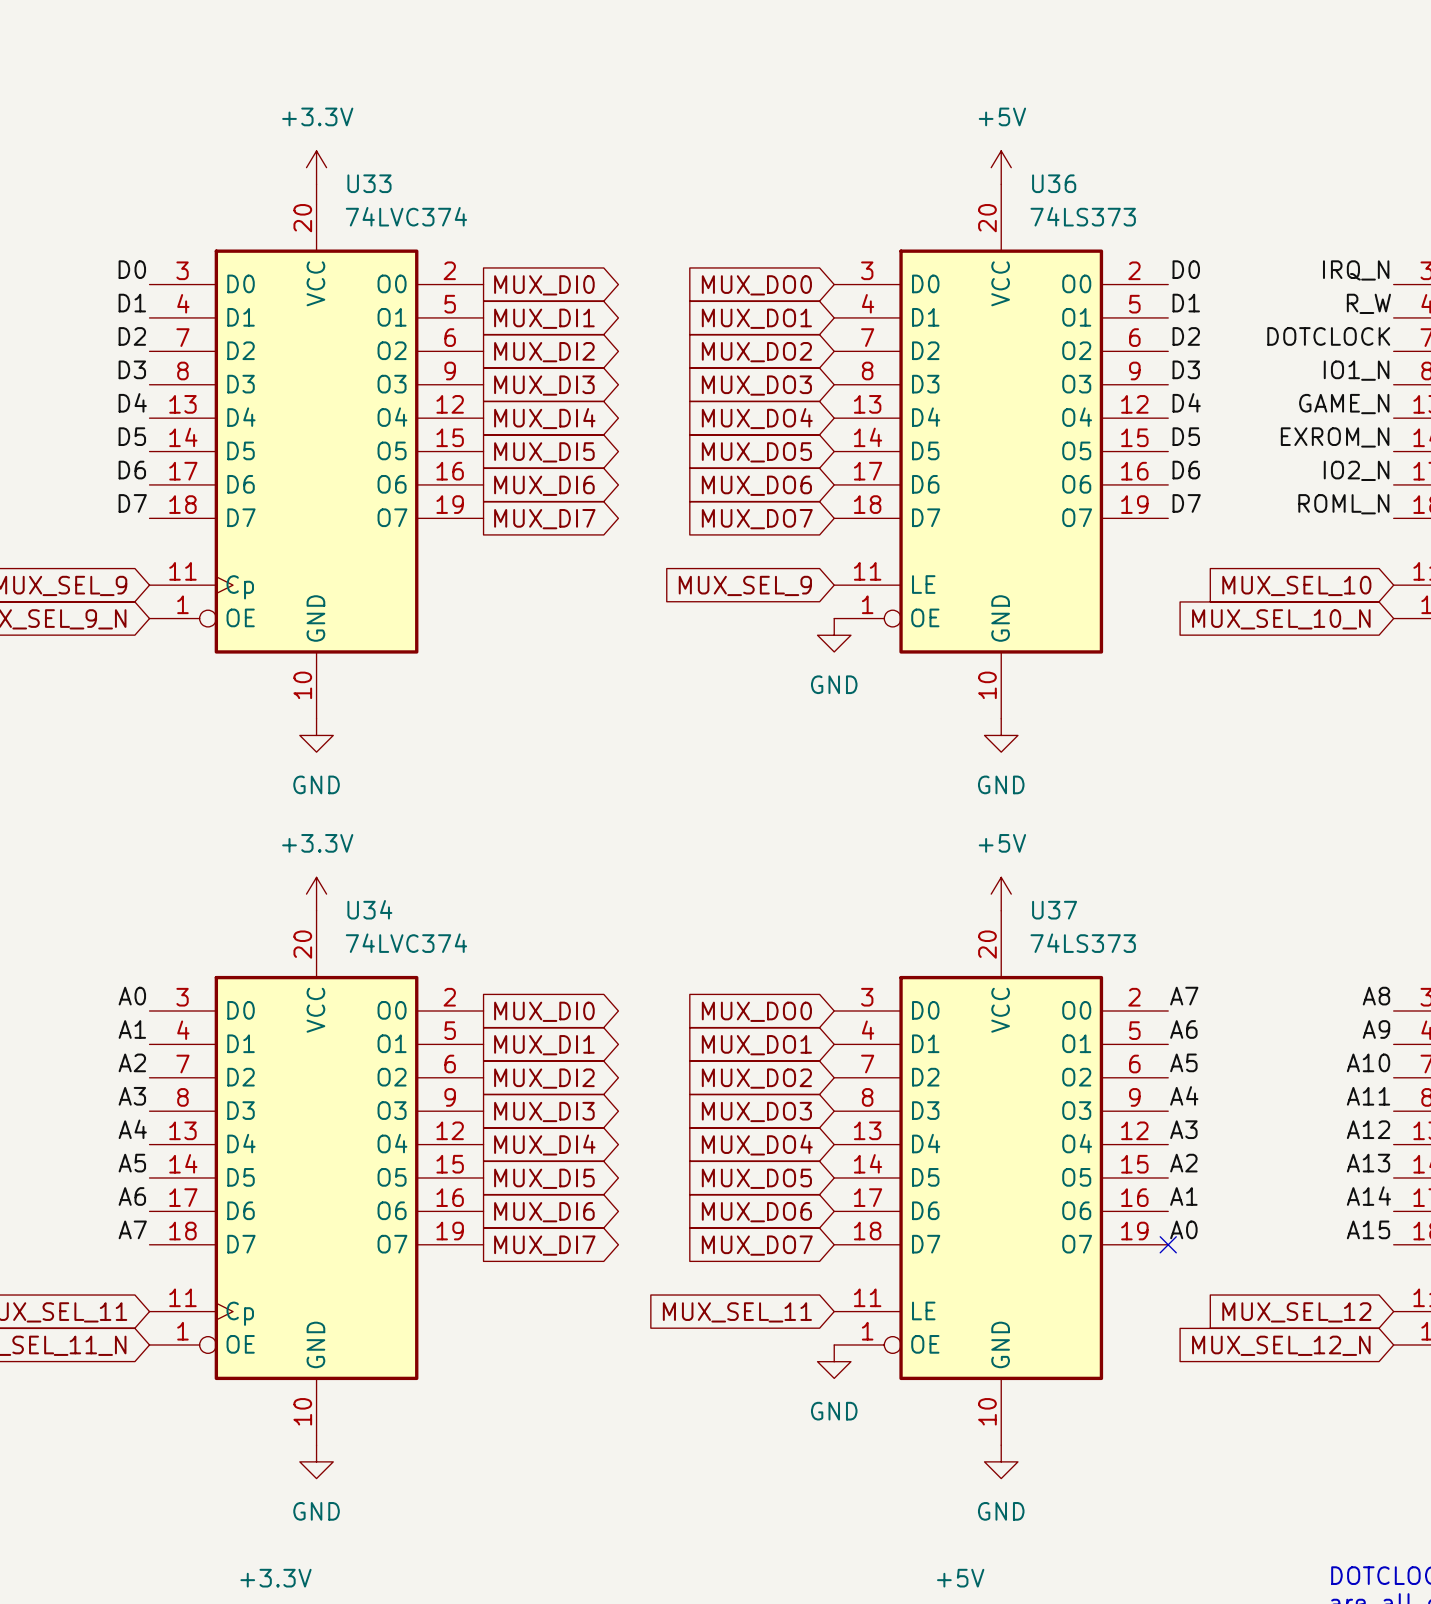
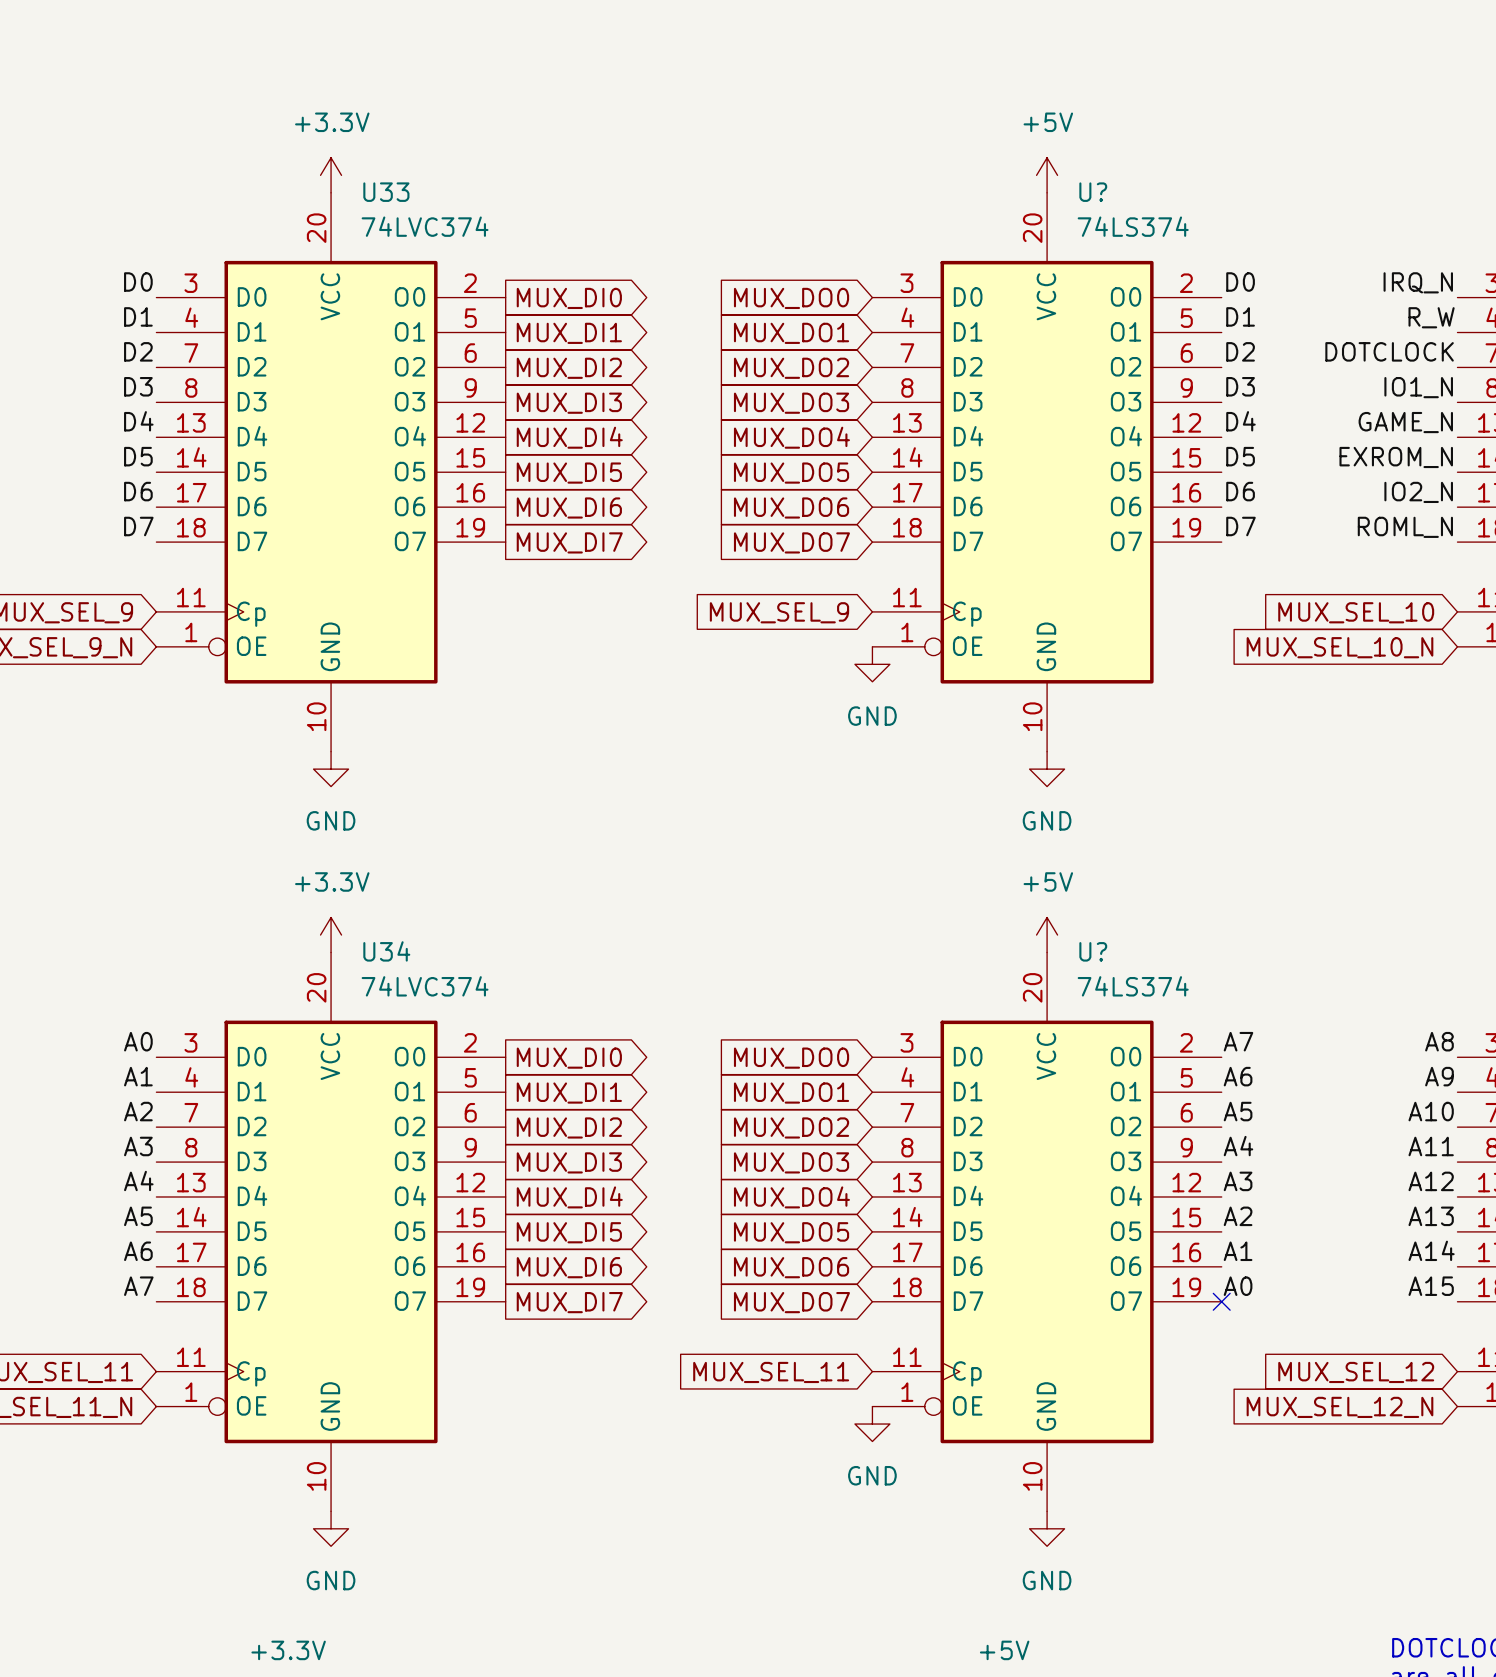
U36: 74LS373 (1001, 451) -> none
U?: none -> 74LS374 (1047, 472)
U37: 74LS373 (1001, 1177) -> none
U?: none -> 74LS374 (1047, 1231)

